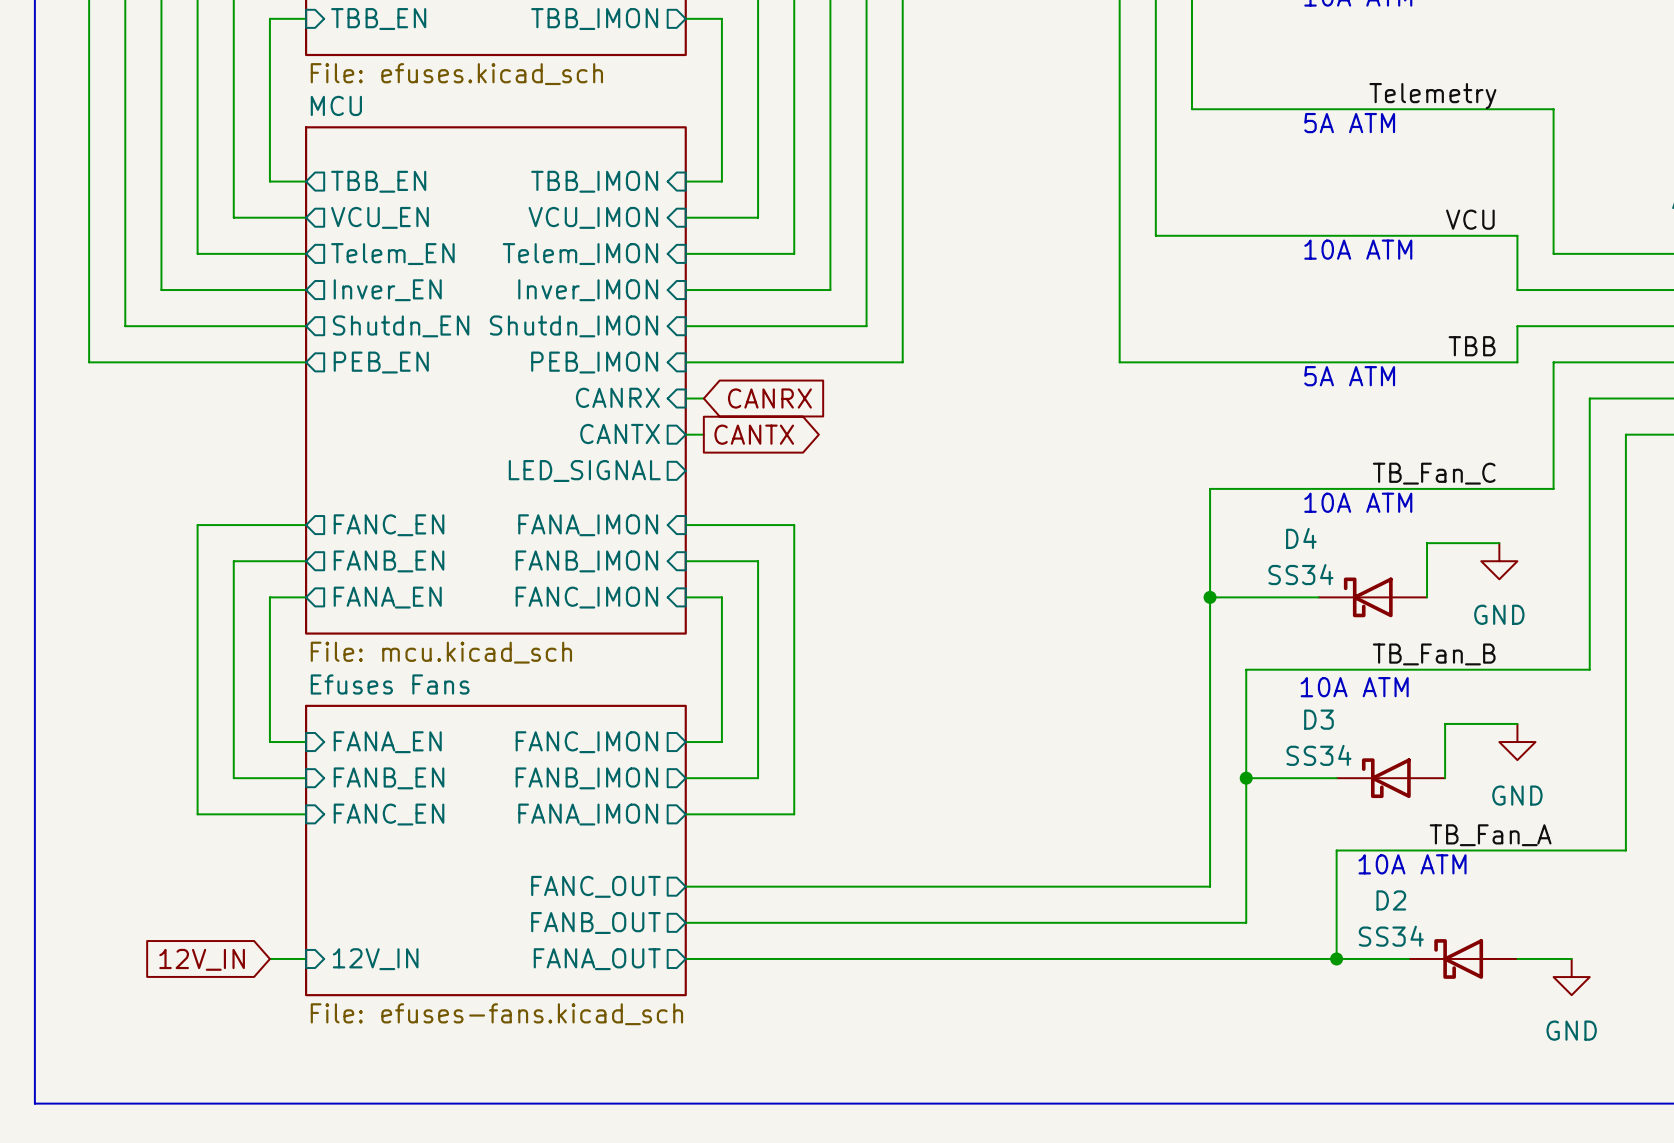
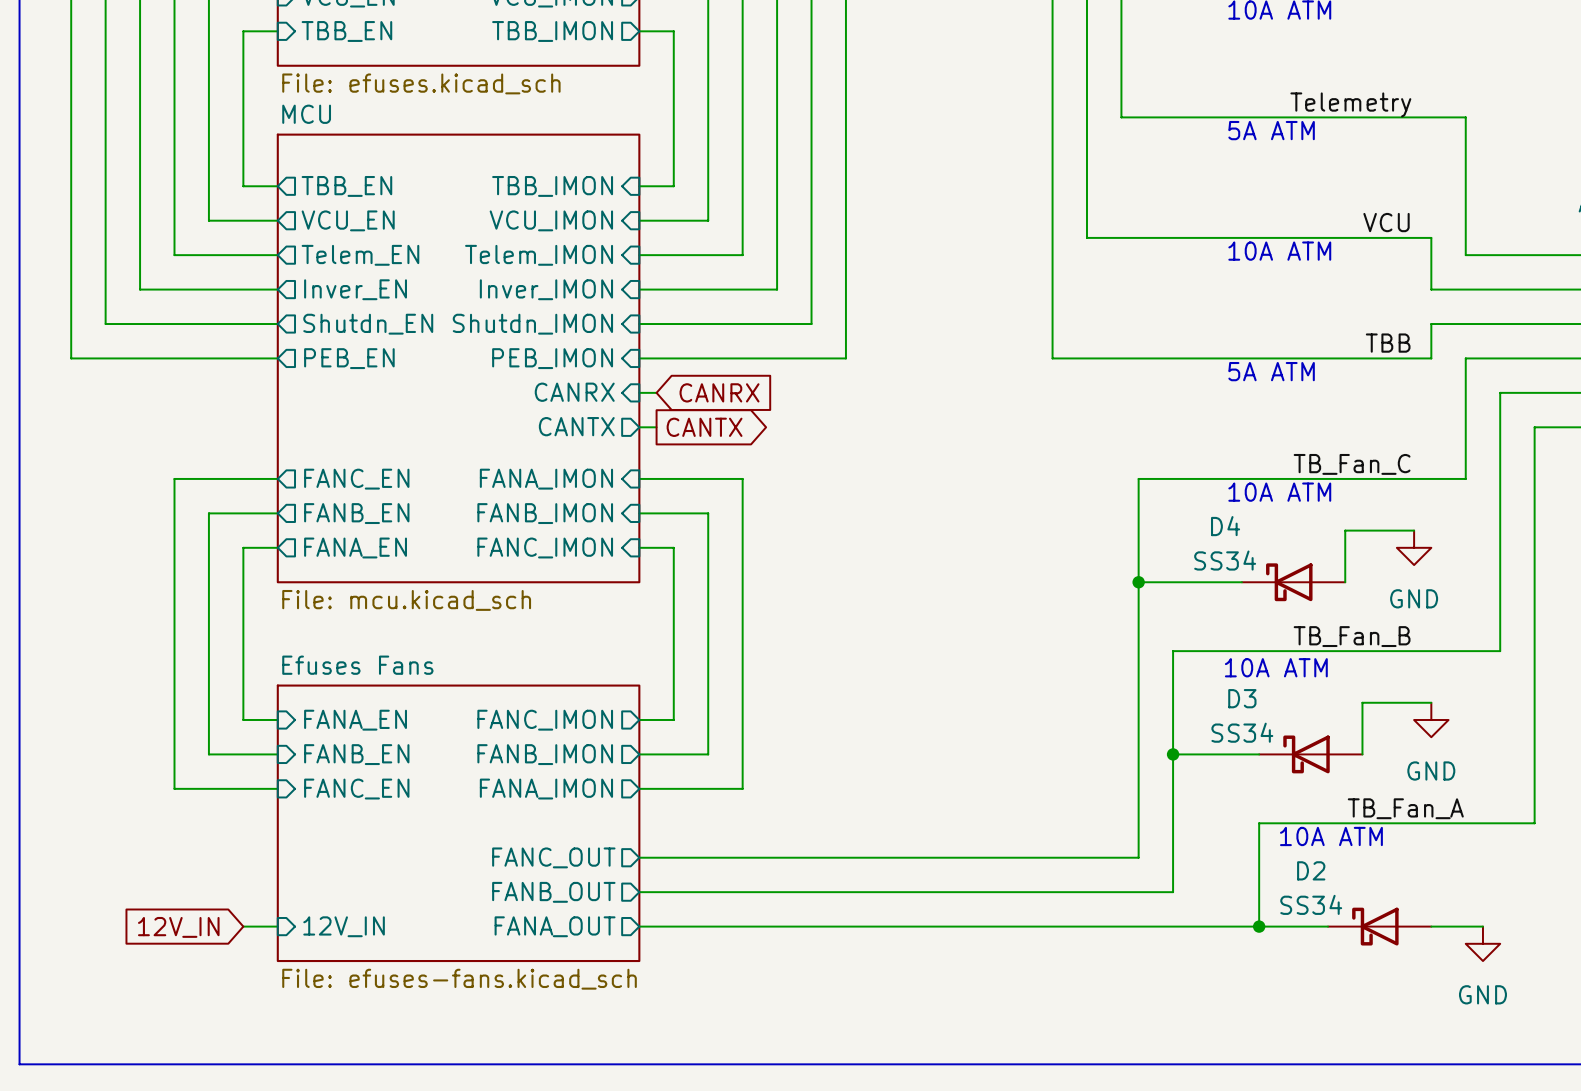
sheet MCU: none -> File: mcu.kicad_sch (458, 358)
sheet MCU: File: mcu.kicad_sch (495, 380) -> none
sheet pin: LED_SIGNAL (584, 471) -> none
wire: none -> (277, 478) (174, 478) (174, 513)
wire: none -> (639, 478) (742, 478) (742, 513)
sheet pin: none -> FANC_EN (356, 479)
sheet pin: none -> FANA_IMON (546, 479)
wire: (197, 525) (233, 525) -> (208, 547) (208, 513)
sheet pin: FANC_EN (389, 525) -> FANB_EN (356, 513)
sheet pin: FANA_IMON (588, 525) -> FANB_IMON (545, 513)
wire: (758, 525) (794, 525) -> (708, 513) (708, 547)
wire: (233, 561) (269, 561) -> (243, 582) (243, 547)
sheet pin: FANB_EN (389, 561) -> FANA_EN (355, 548)
sheet pin: FANB_IMON (586, 561) -> FANC_IMON (545, 548)
wire: (721, 561) (758, 561) -> none
wire: (269, 597) (306, 597) -> none
sheet pin: FANA_EN (387, 597) -> none
sheet pin: FANC_IMON (586, 597) -> none
wire: (685, 597) (721, 597) -> (673, 547) (673, 582)

